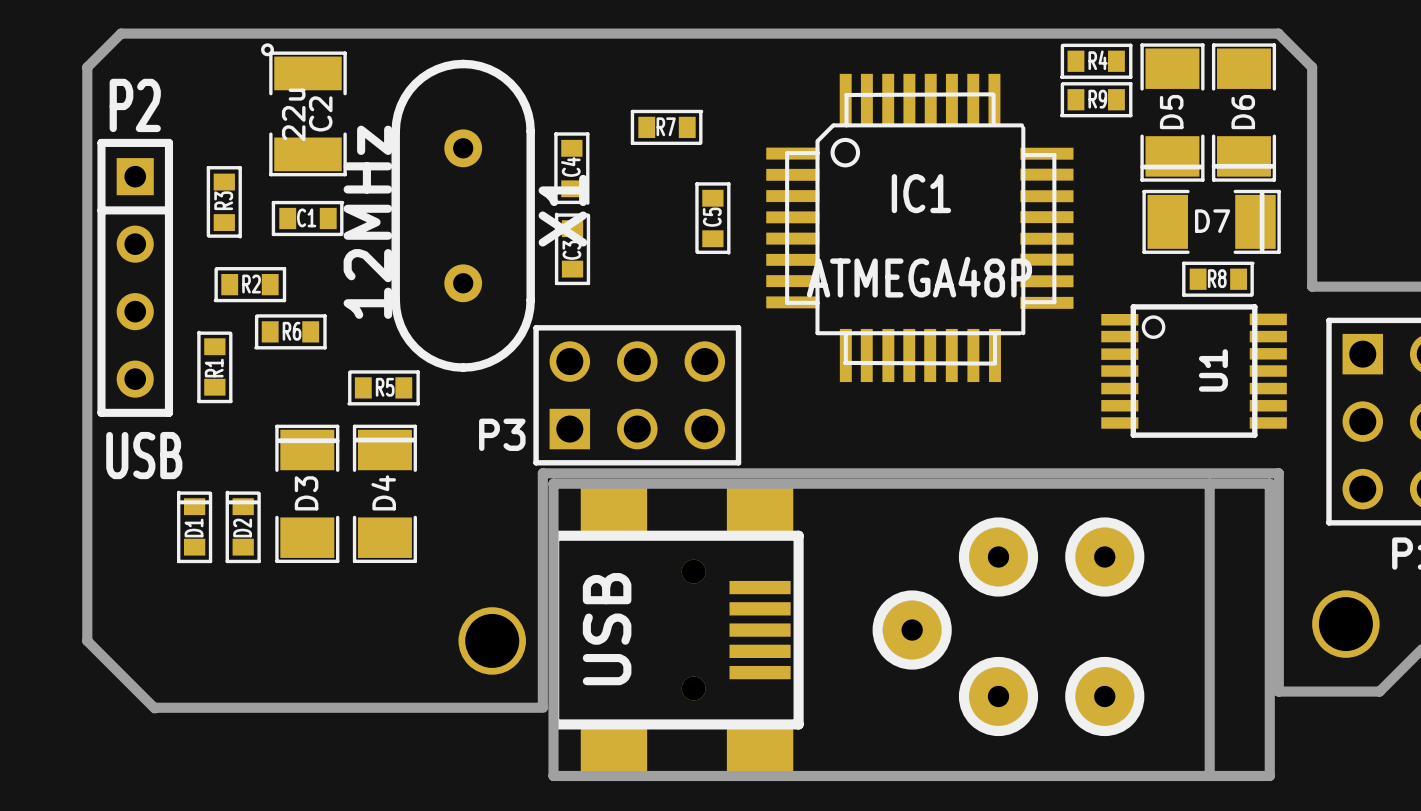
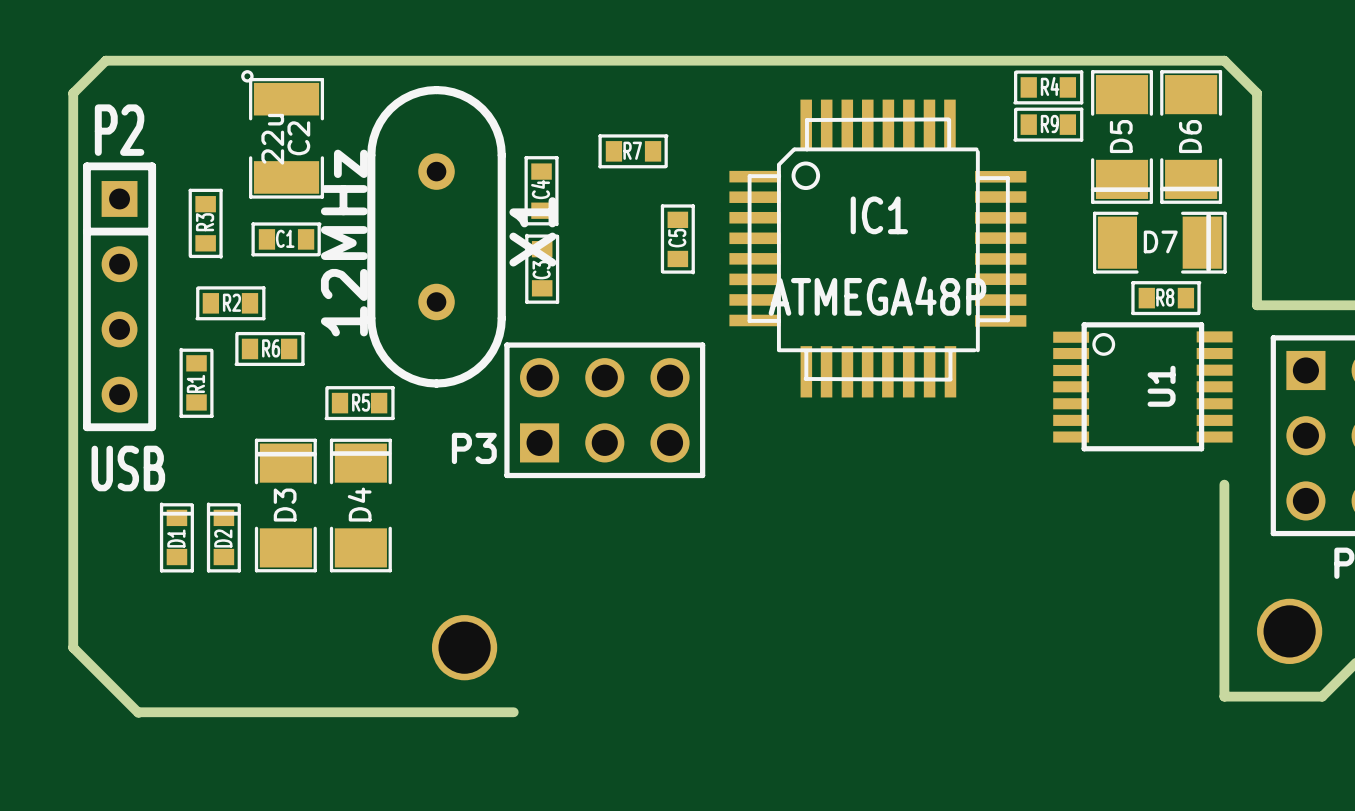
board edge: (553, 483) (553, 775) (1269, 775) (1269, 483) (553, 483) -> none
board edge: (1209, 483) (1209, 775) -> none
part: (998, 557) -> none
part: (1104, 557) -> none
USB: (676, 630) -> none
part: (912, 630) -> none
board edge: (1278, 691) (1278, 473) (542, 473) (542, 705) -> (1224, 696) (1224, 484)
part: (998, 696) -> none
part: (1104, 696) -> none

